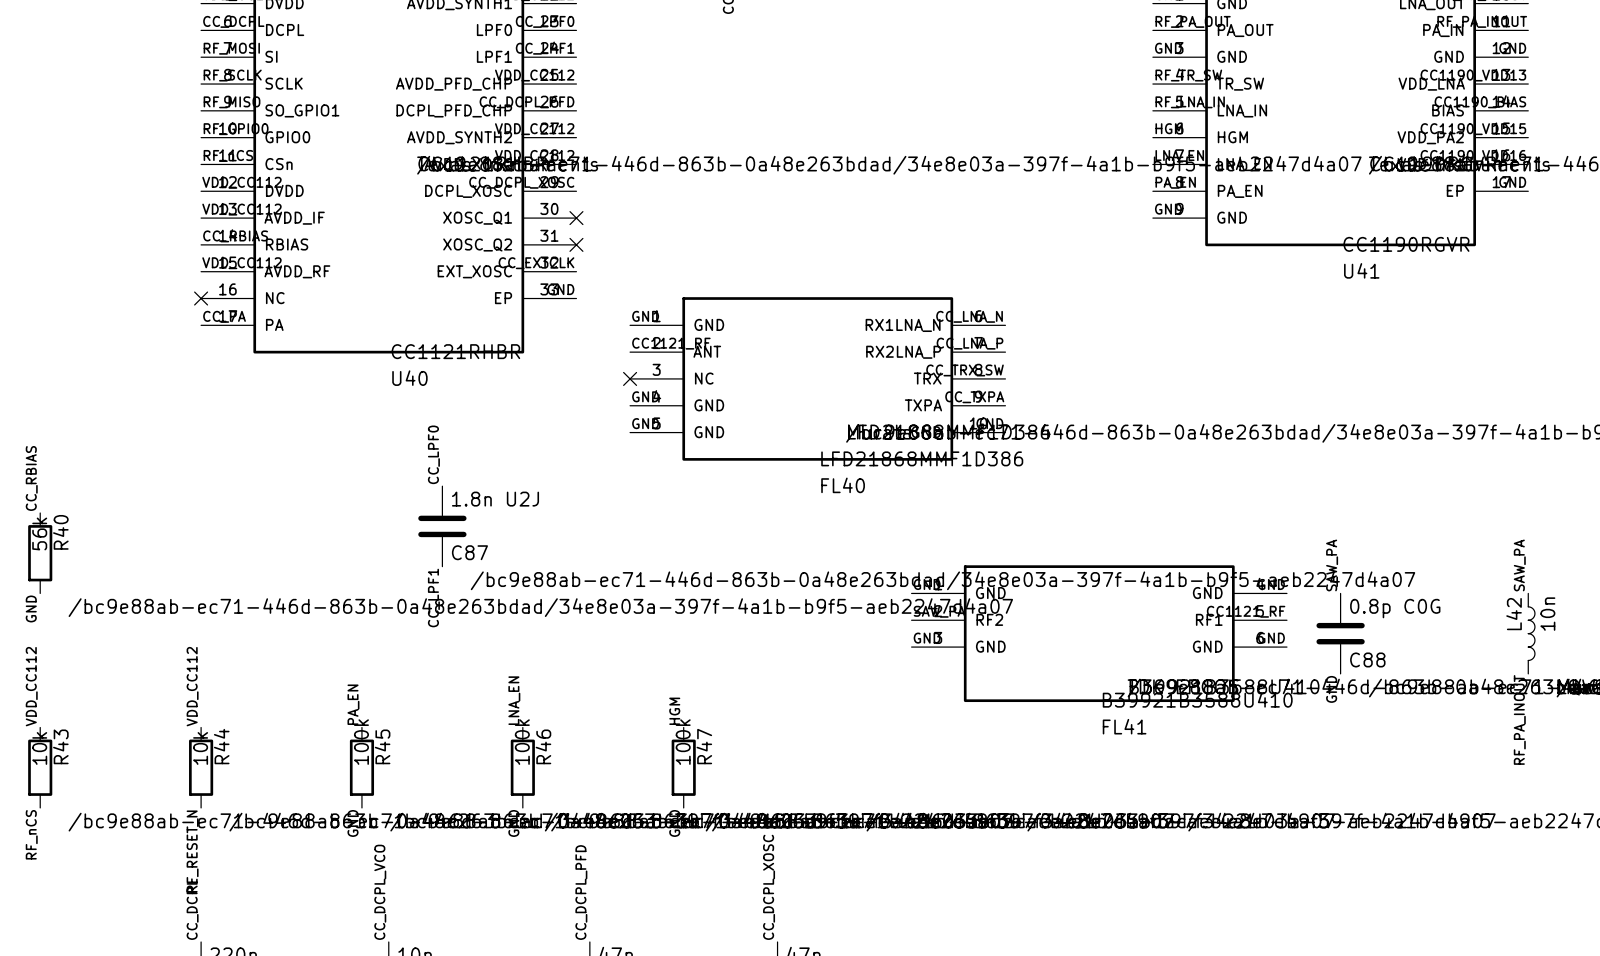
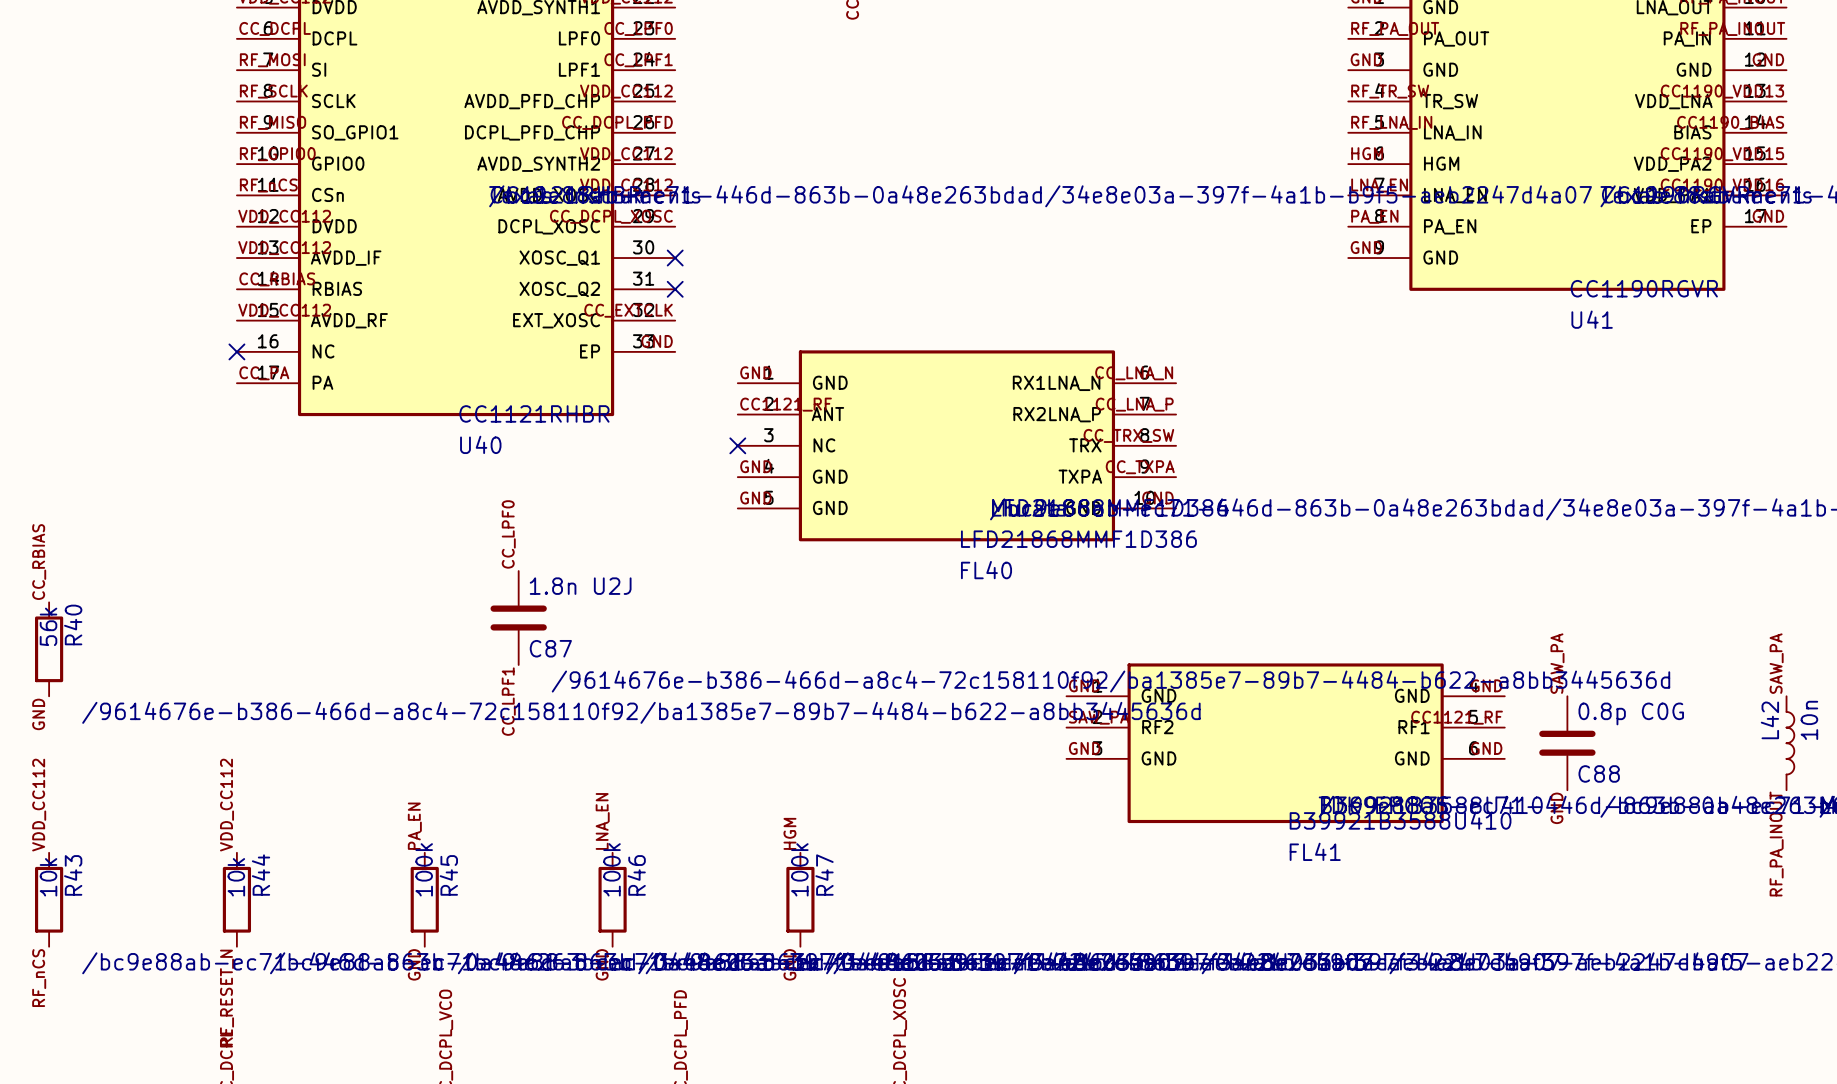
C87 text: /bc9e88ab-ec71-446d-863b-0a48e263bdad/34e8e03a-397f-4a1b-b9f5-aeb2247d4a07 (942, 580) -> /9614676e-b386-466d-a8c4-72c158110f92/ba1385e7-89b7-4484-b622-a8bb3445636d (1110, 681)
R40 text: /bc9e88ab-ec71-446d-863b-0a48e263bdad/34e8e03a-397f-4a1b-b9f5-aeb2247d4a07 (540, 607) -> /9614676e-b386-466d-a8c4-72c158110f92/ba1385e7-89b7-4484-b622-a8bb3445636d (641, 712)

